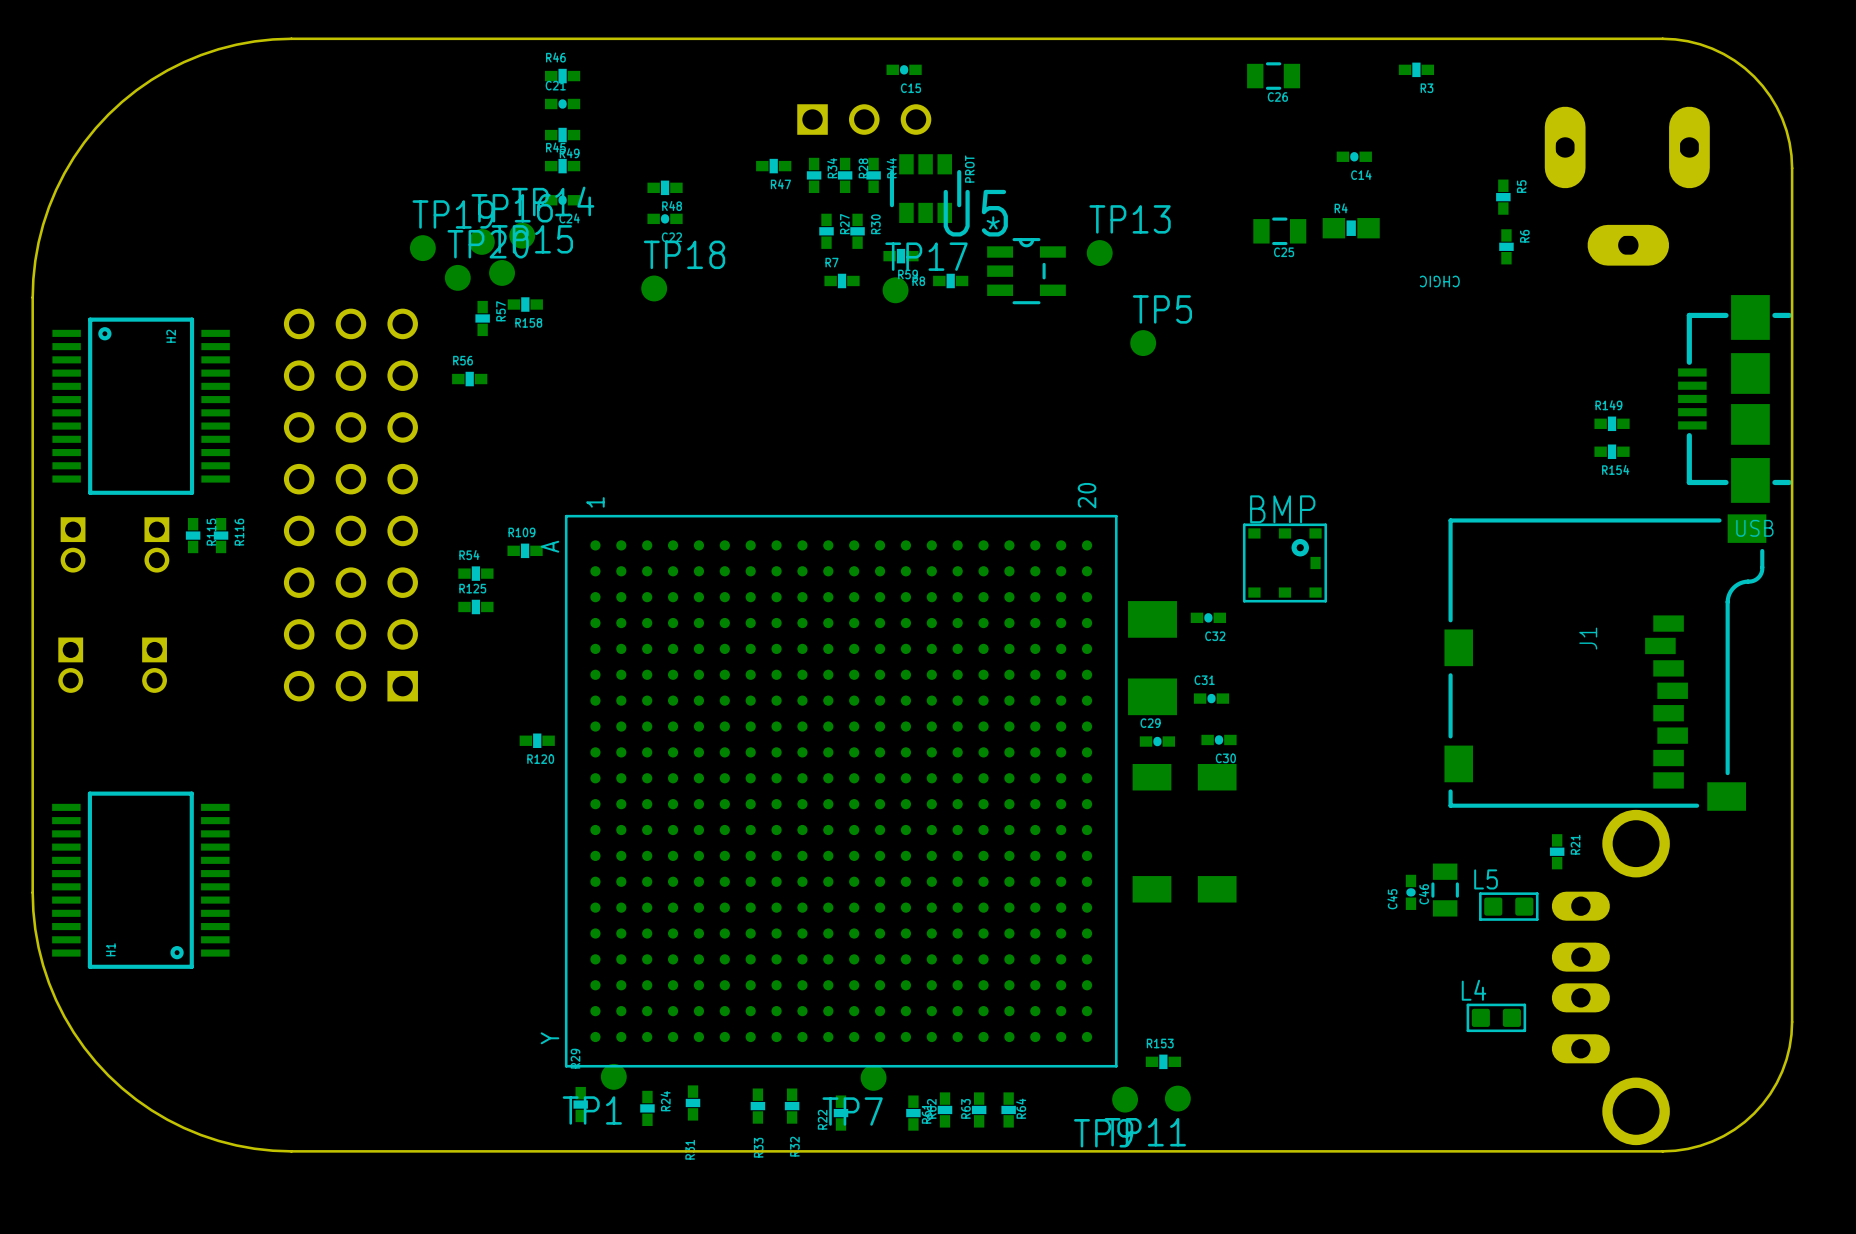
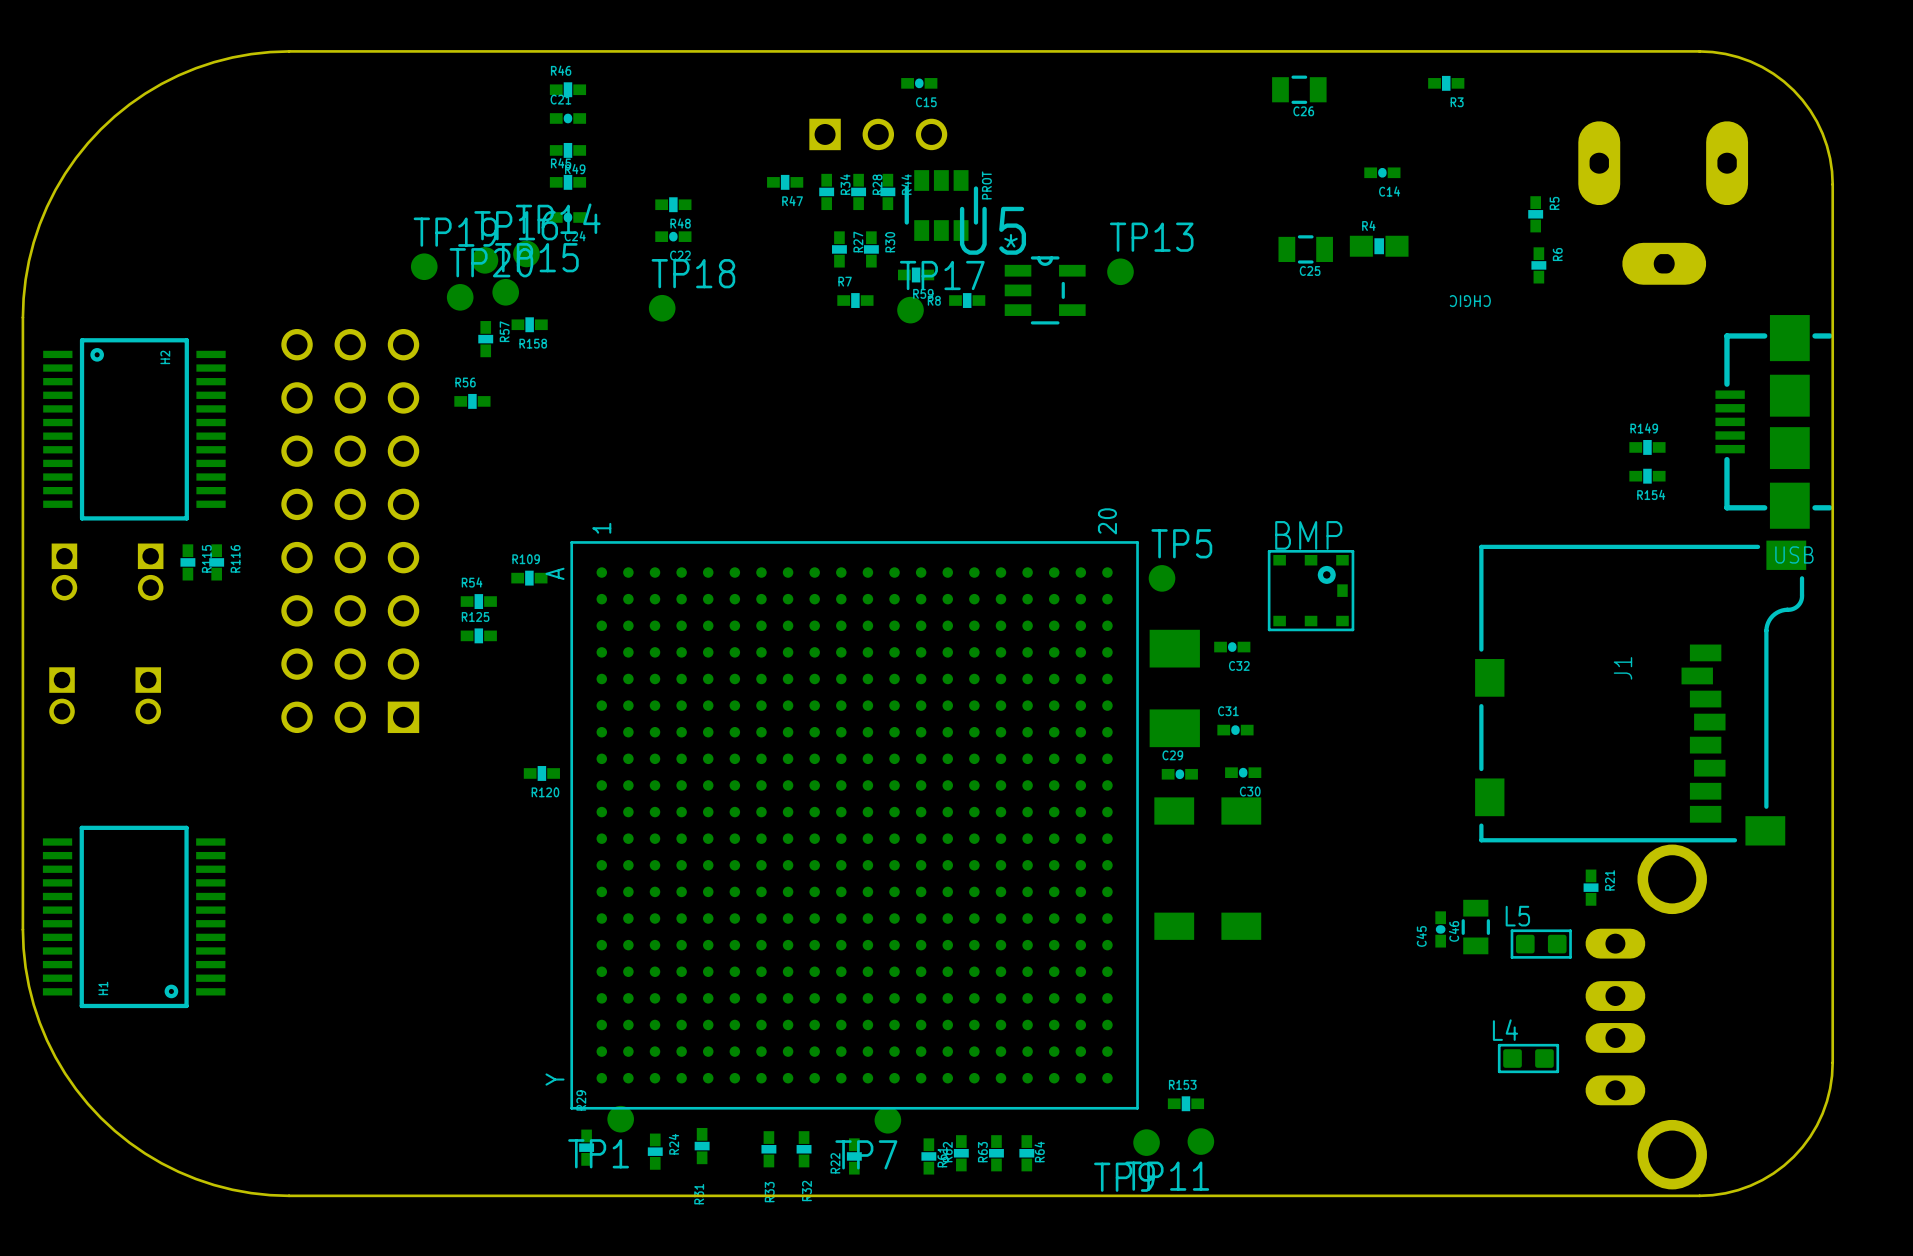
TP5 position: (1143, 343) -> (1162, 578)

